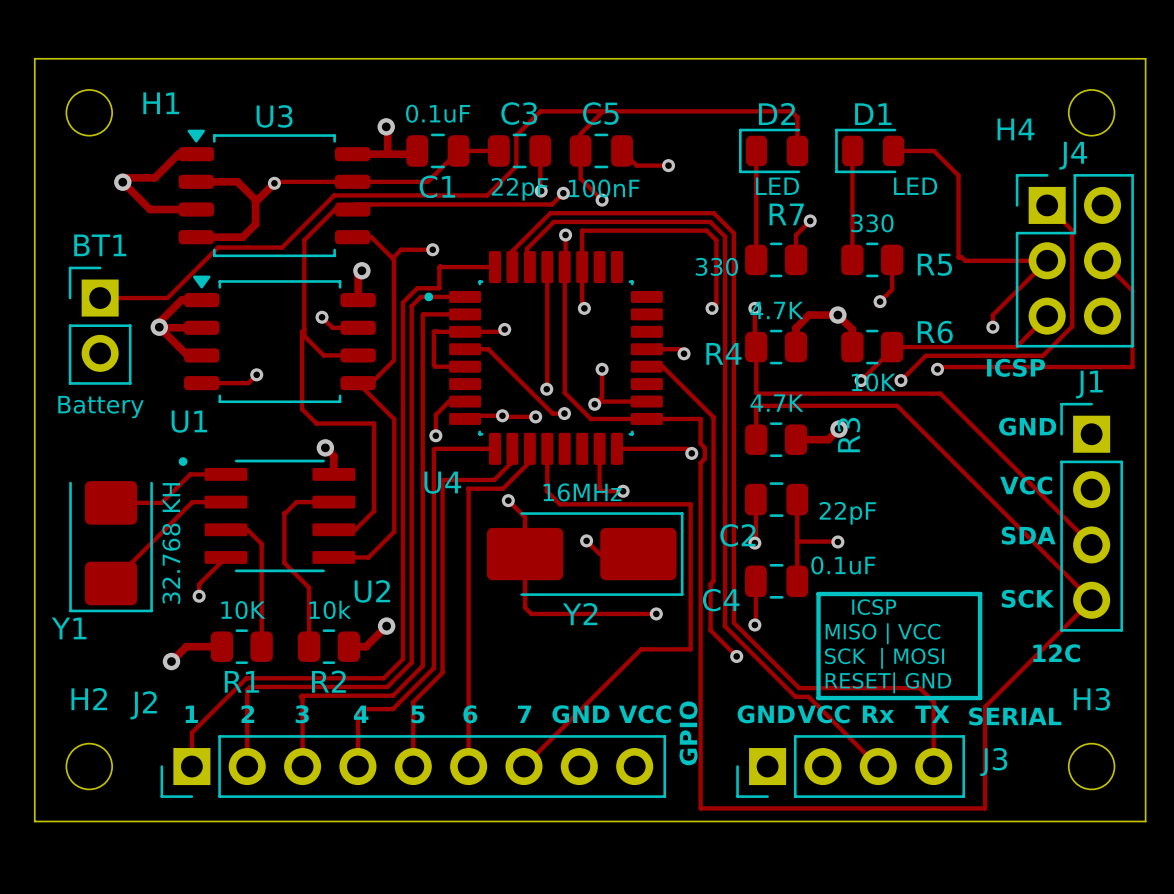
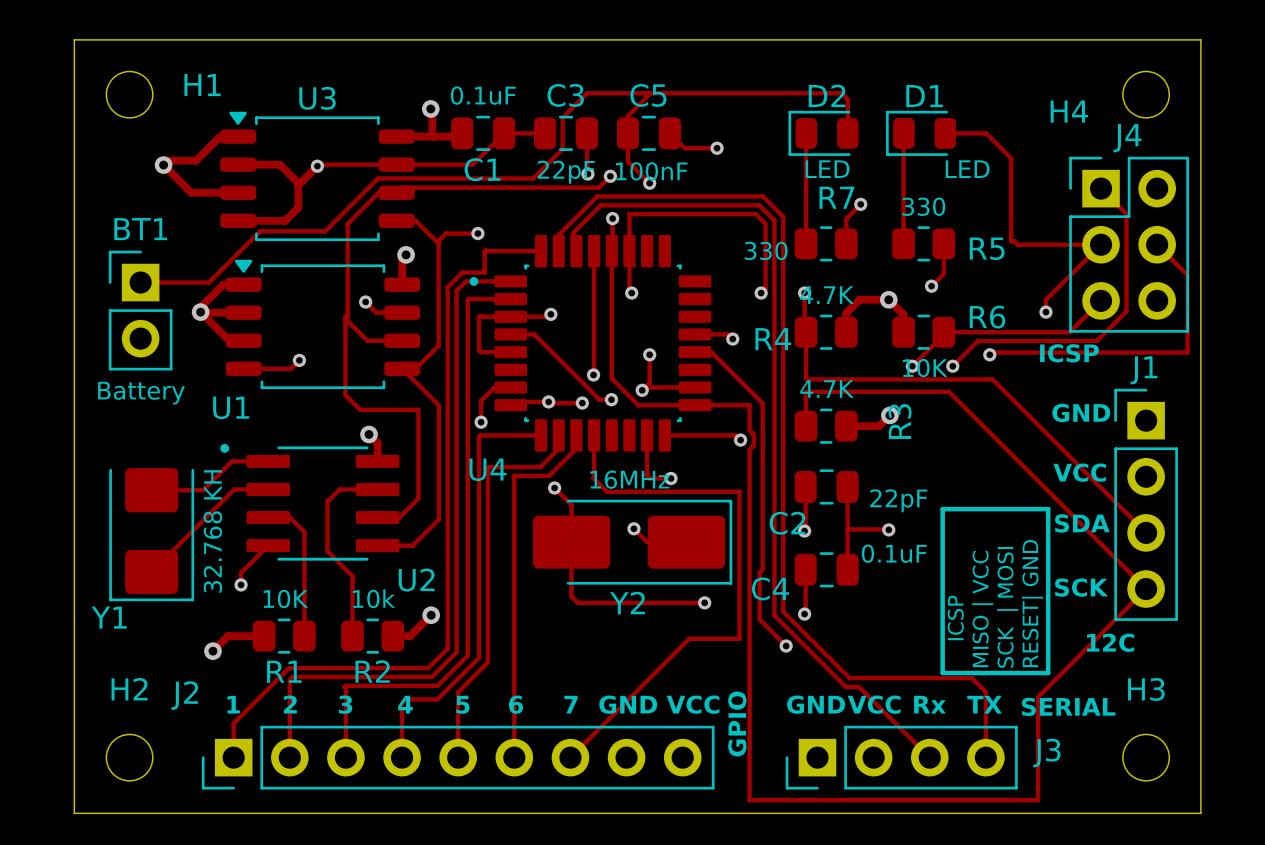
line: none -> (942, 509) (1048, 509) (1048, 673) (942, 673) (942, 509)
line: (818, 594) (980, 594) (980, 698) (818, 698) (818, 594) -> none
text rotation: 0° (874, 607) -> 90° counterclockwise (955, 617)
text rotation: 0° (882, 633) -> 90° counterclockwise (982, 609)
text rotation: 0° (884, 658) -> 90° counterclockwise (1007, 607)
text rotation: 0° (888, 682) -> 90° counterclockwise (1032, 603)

